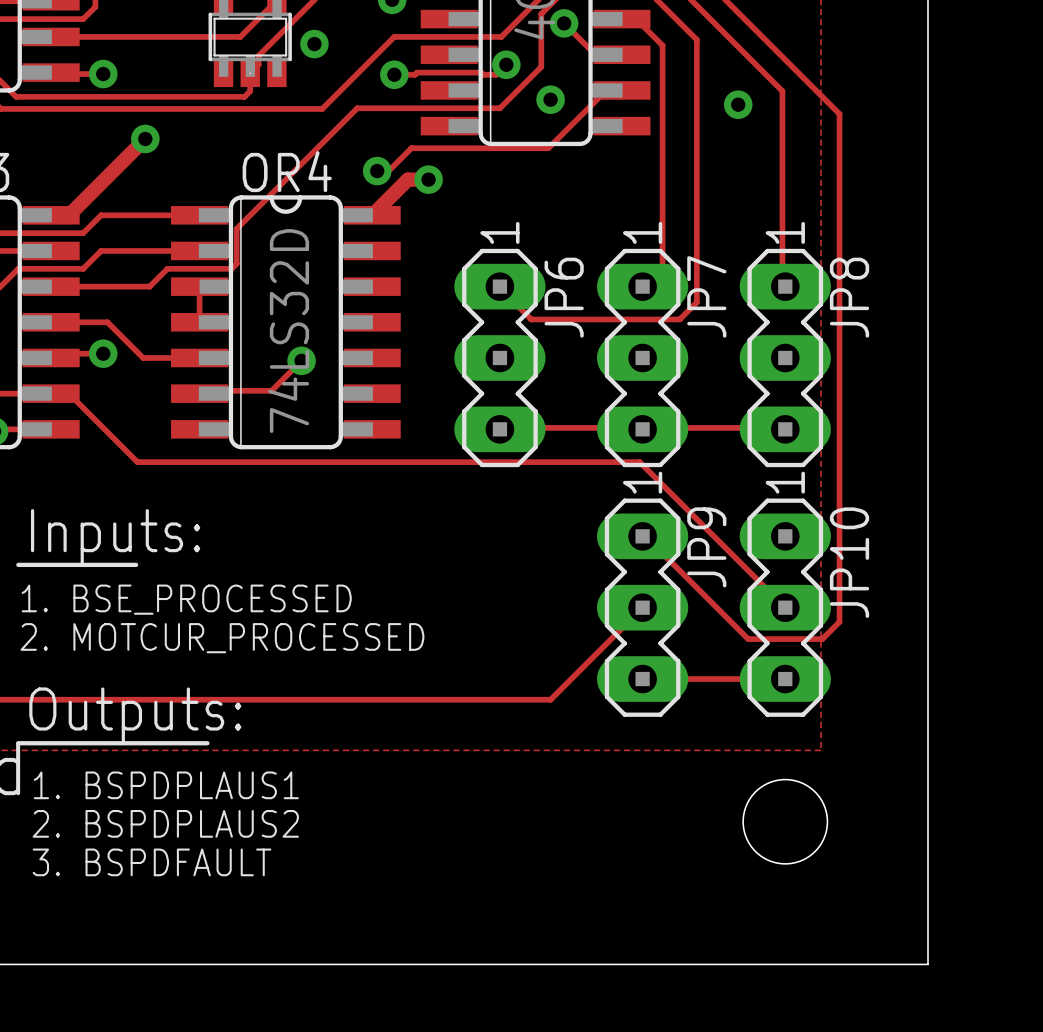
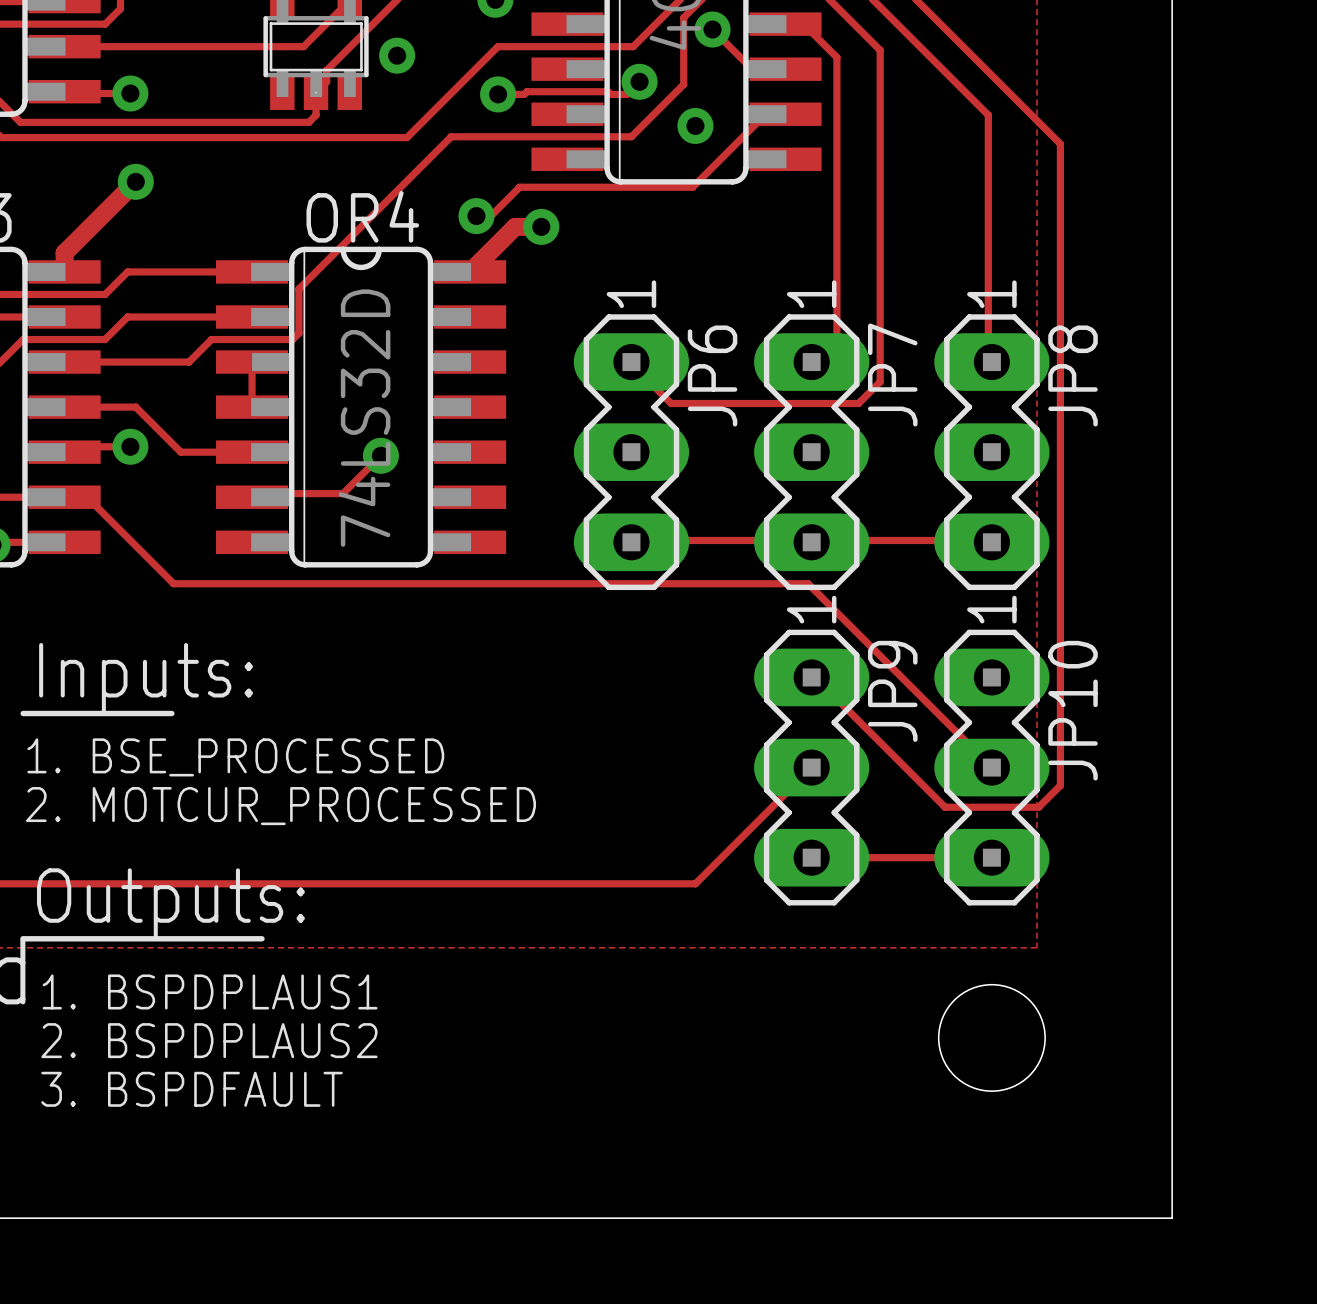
via: (738, 104) -> none
track: (145, 138) (69, 215) (51, 215) -> (135, 181) (64, 253) (64, 271)
via position: (145, 138) -> (135, 181)

